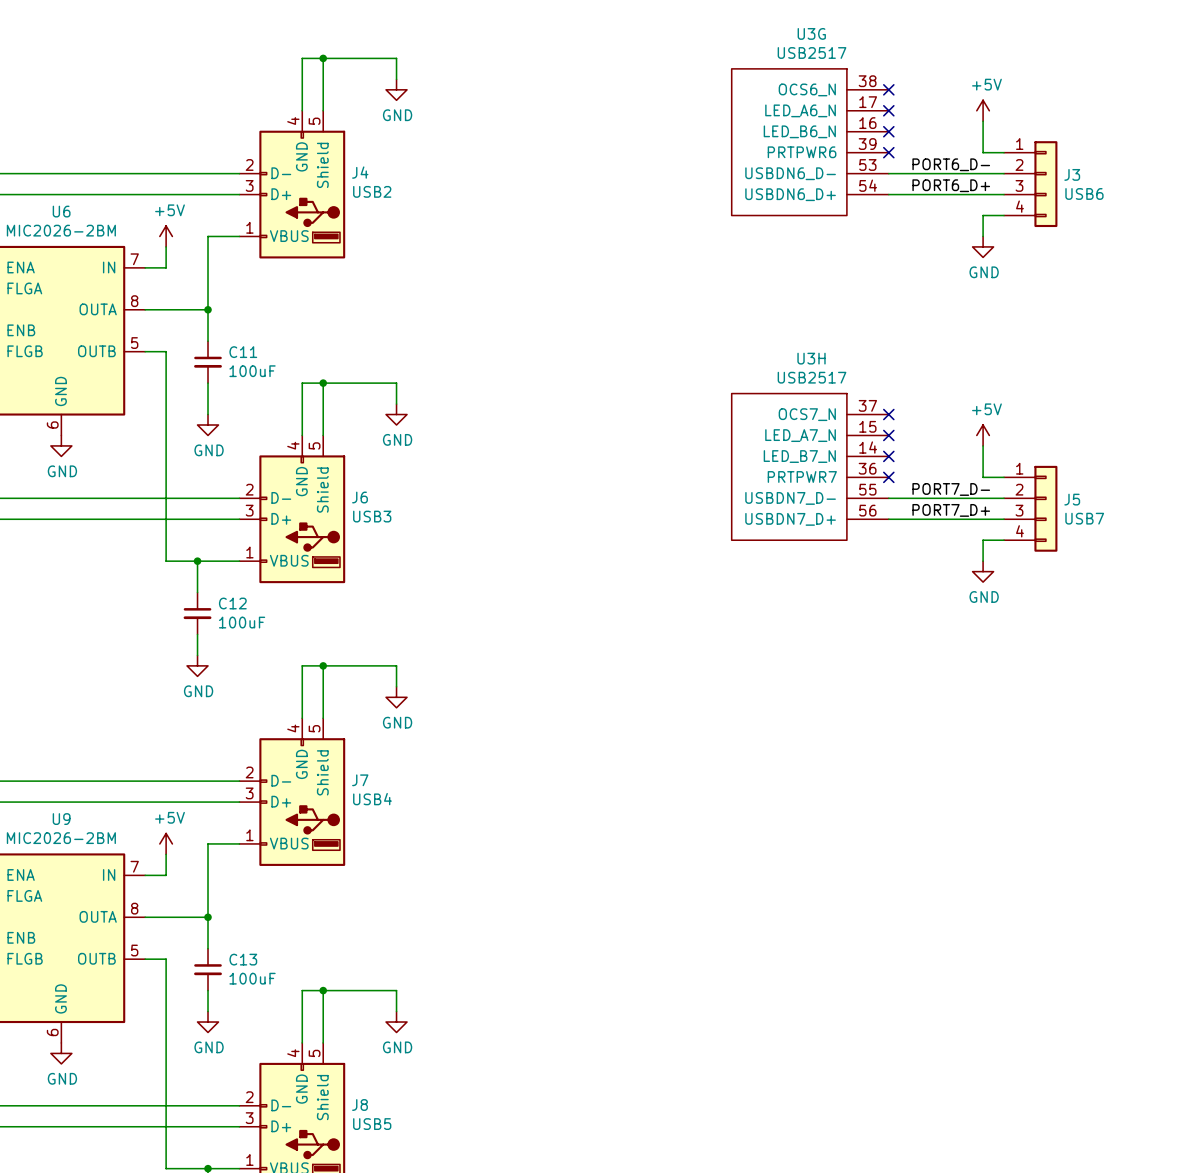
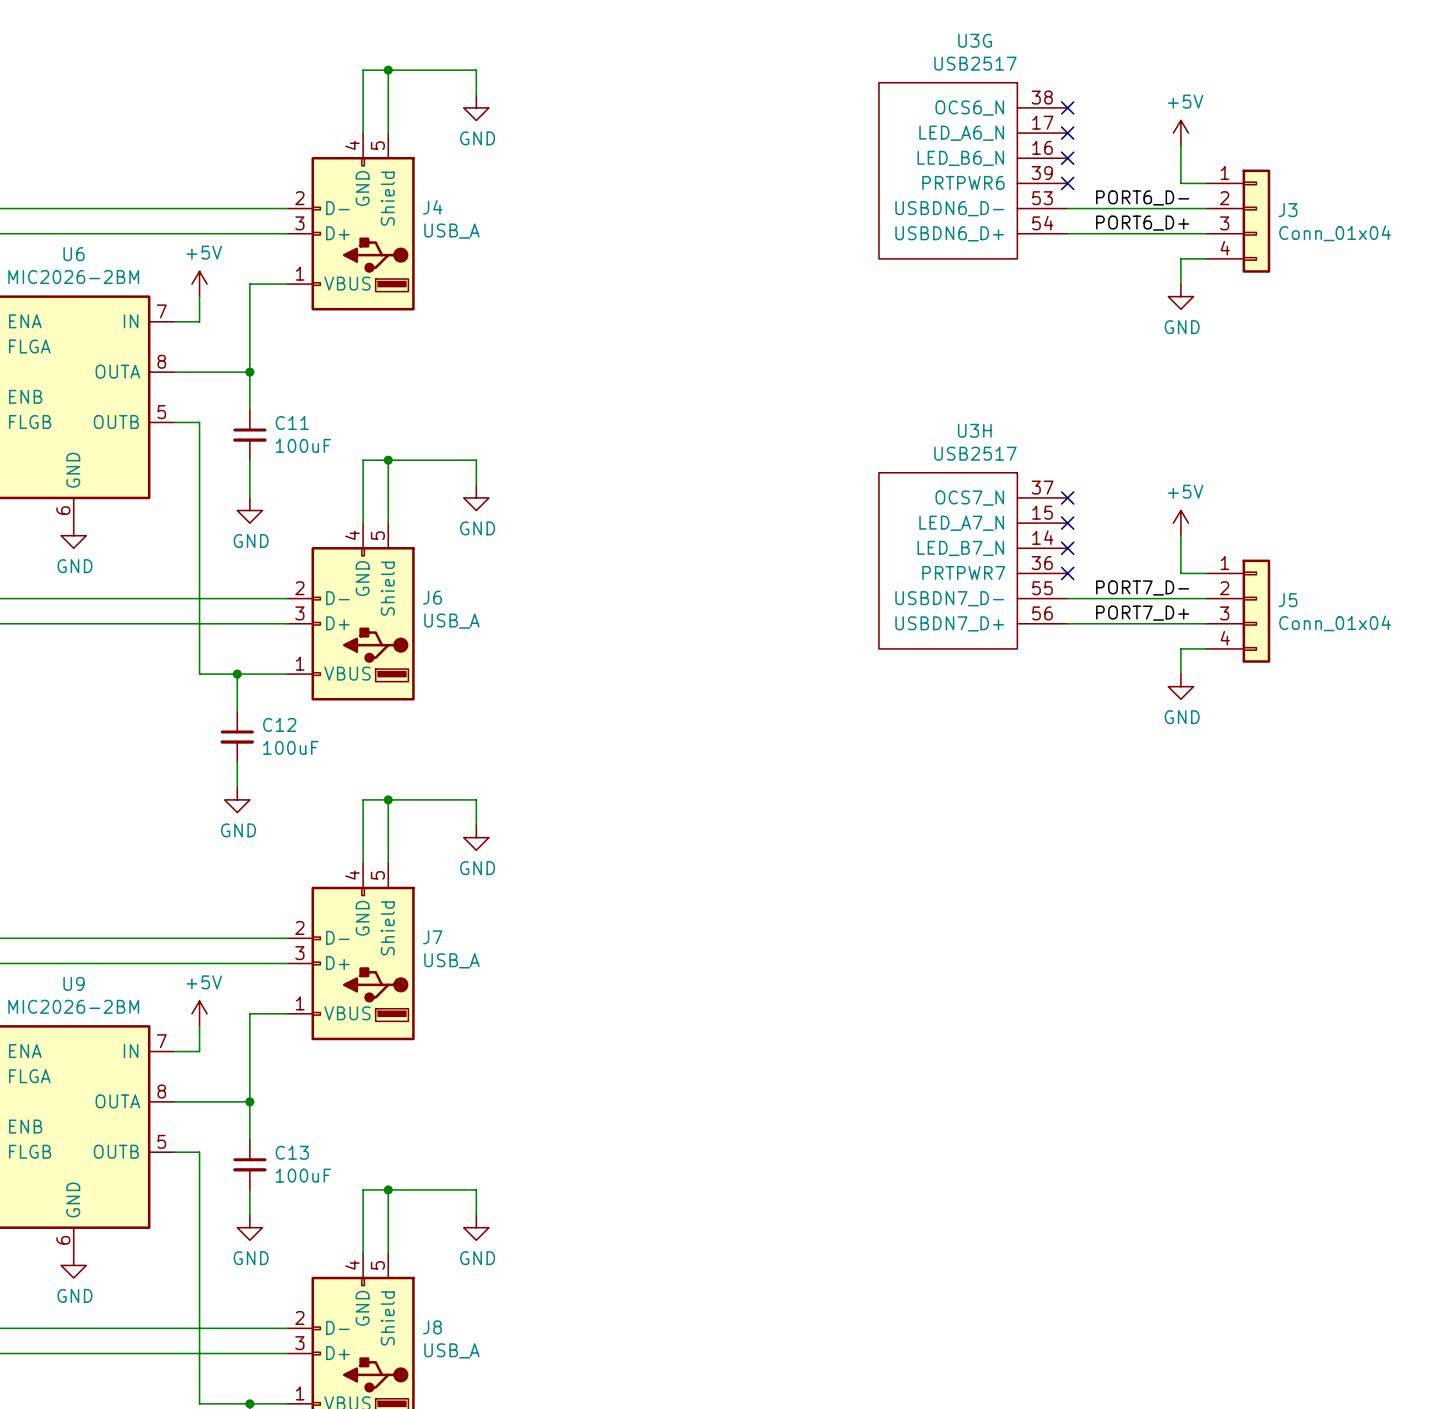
J4 value: USB2 (372, 191) -> USB_A (451, 231)
J3 value: USB6 (1084, 193) -> Conn_01x04 (1335, 233)
J6 value: USB3 (372, 516) -> USB_A (451, 621)
J5 value: USB7 (1084, 518) -> Conn_01x04 (1335, 623)
J7 value: USB4 (372, 799) -> USB_A (451, 960)
J8 value: USB5 (372, 1124) -> USB_A (451, 1350)

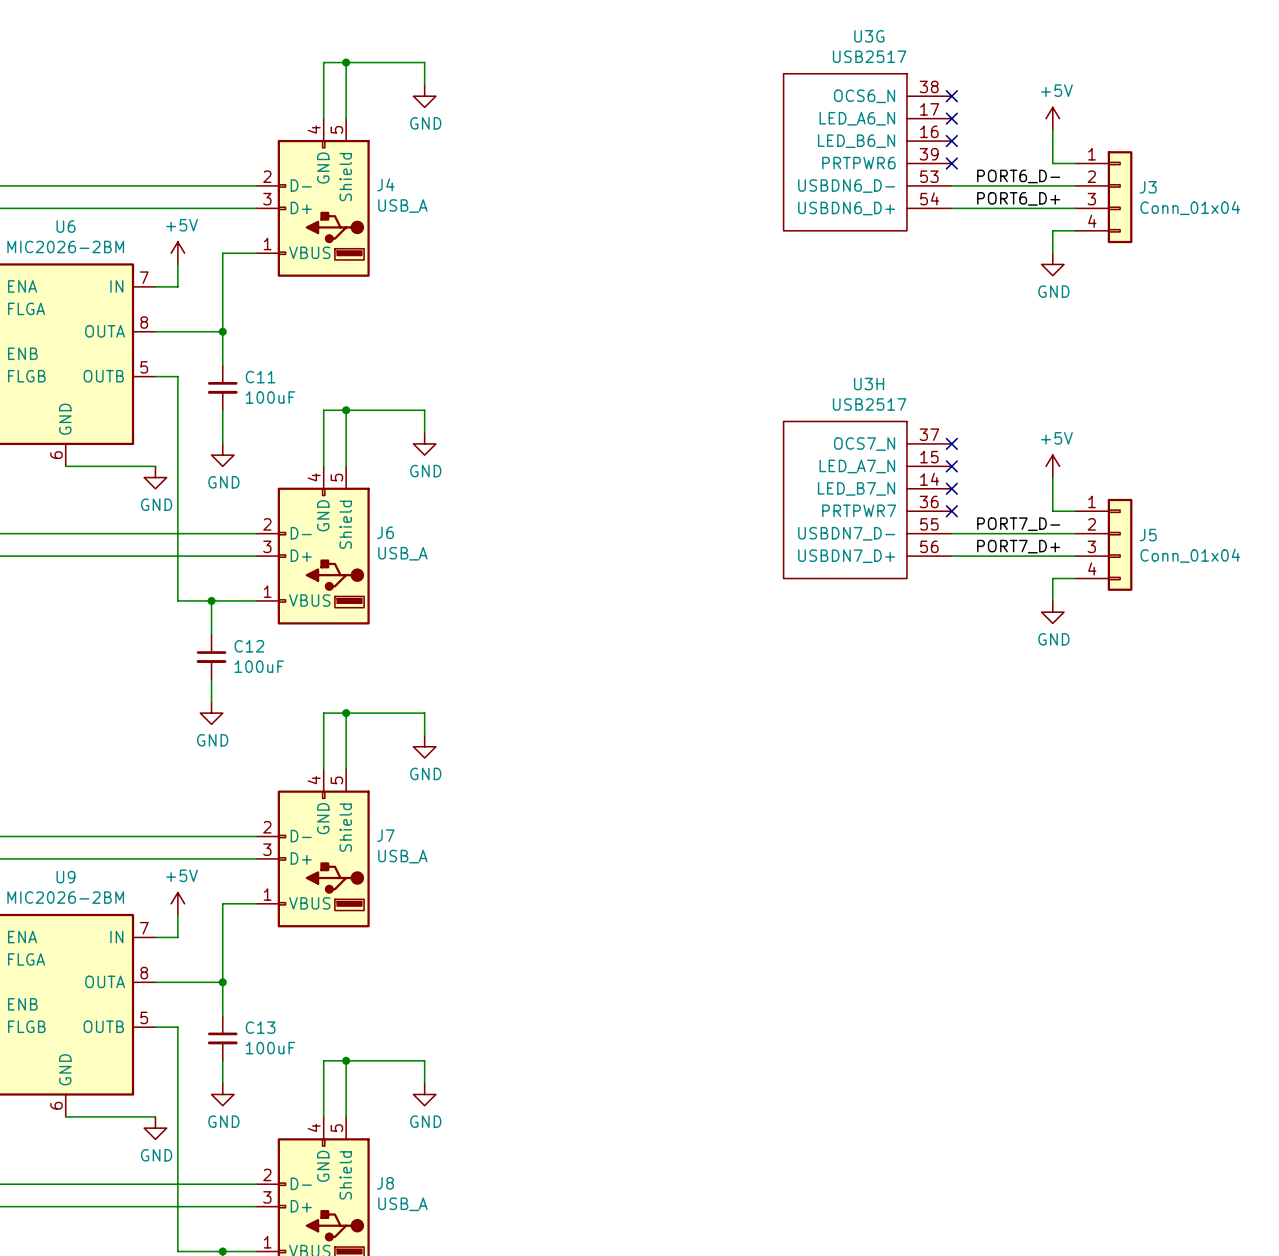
wire: none -> (65, 466) (155, 466)
power symbol position: GND (73, 535) -> GND (155, 477)
wire: none -> (65, 1116) (155, 1116)
power symbol position: GND (73, 1265) -> GND (155, 1128)

